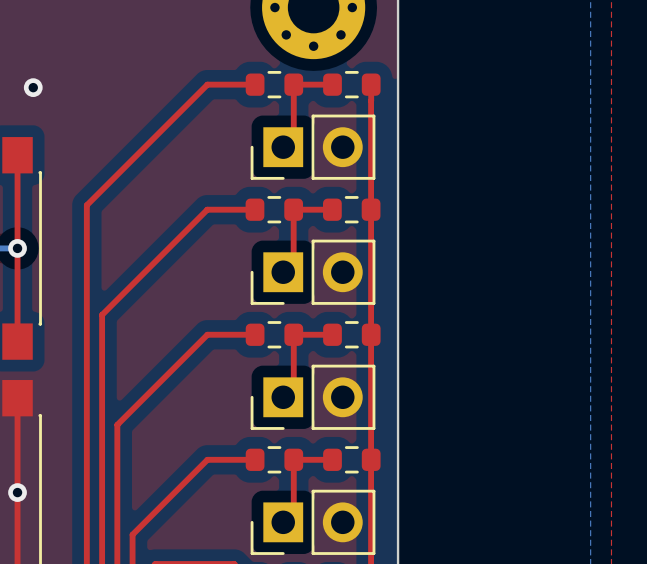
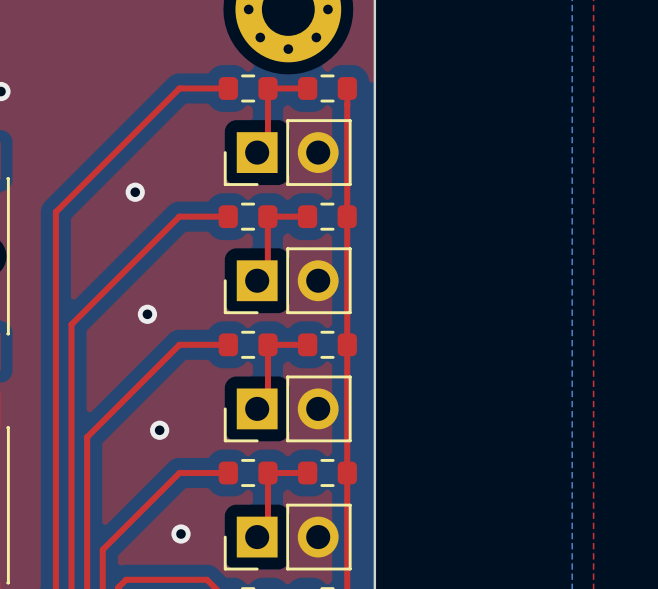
via: none -> (135, 192)
via: none -> (147, 314)
via: none -> (159, 430)
via: none -> (181, 534)

